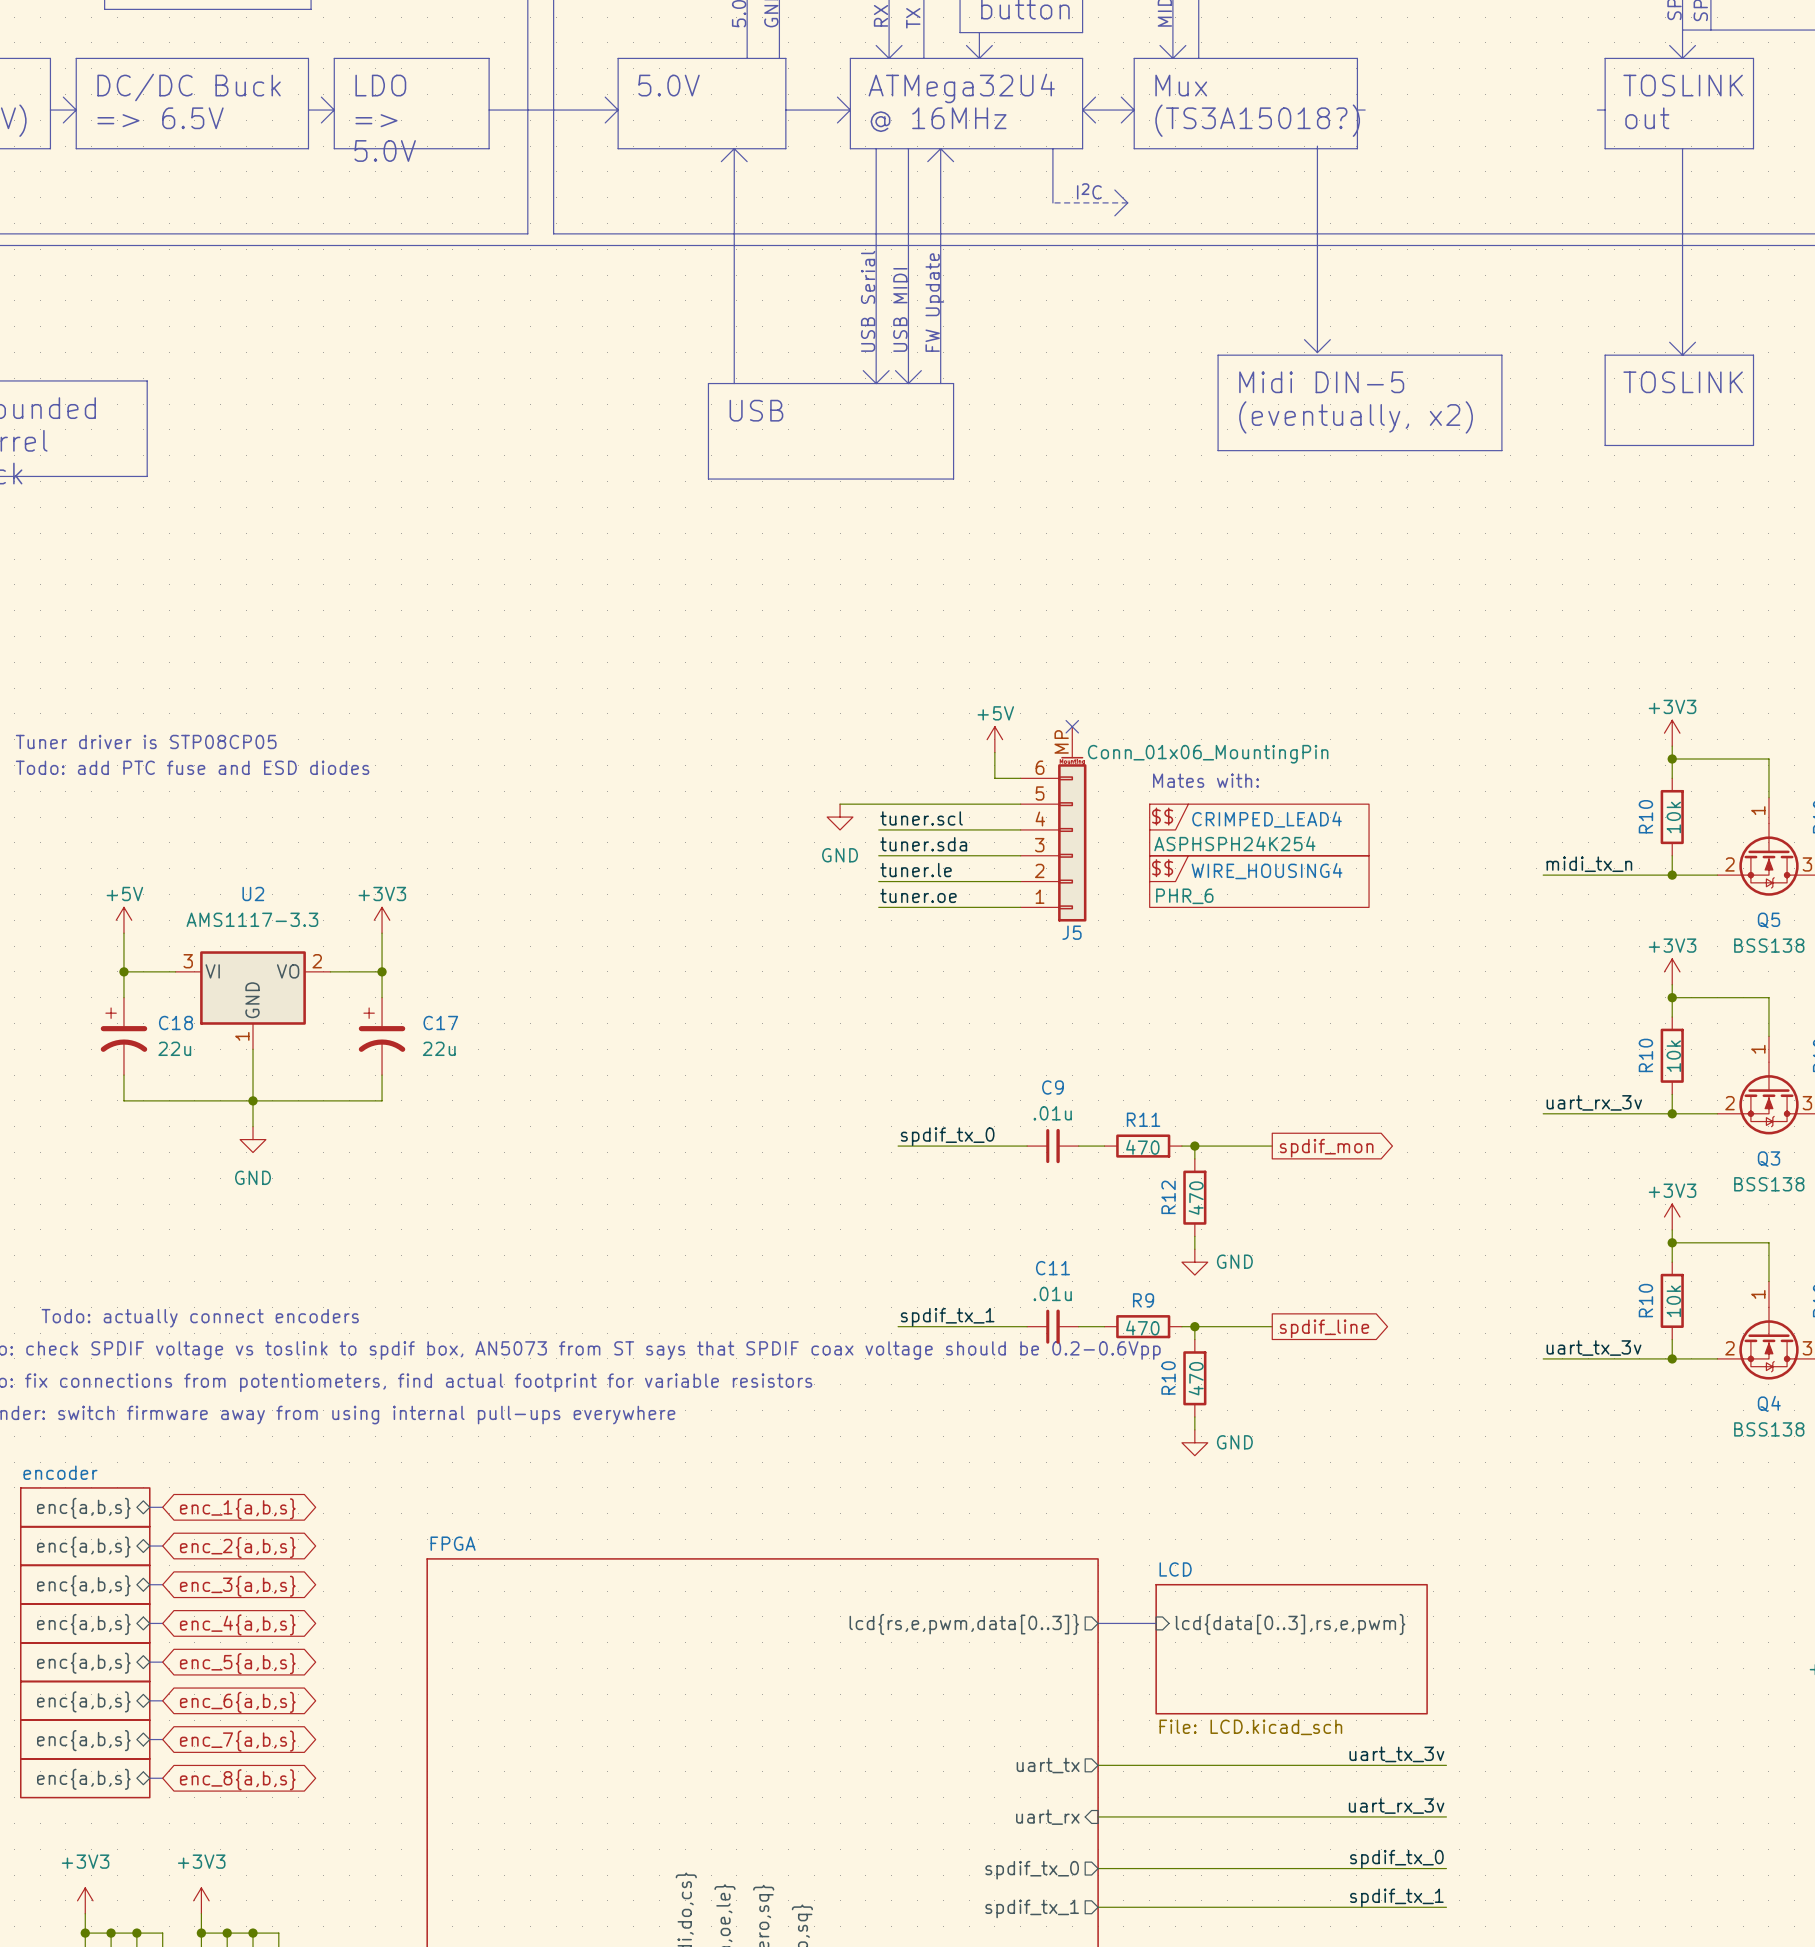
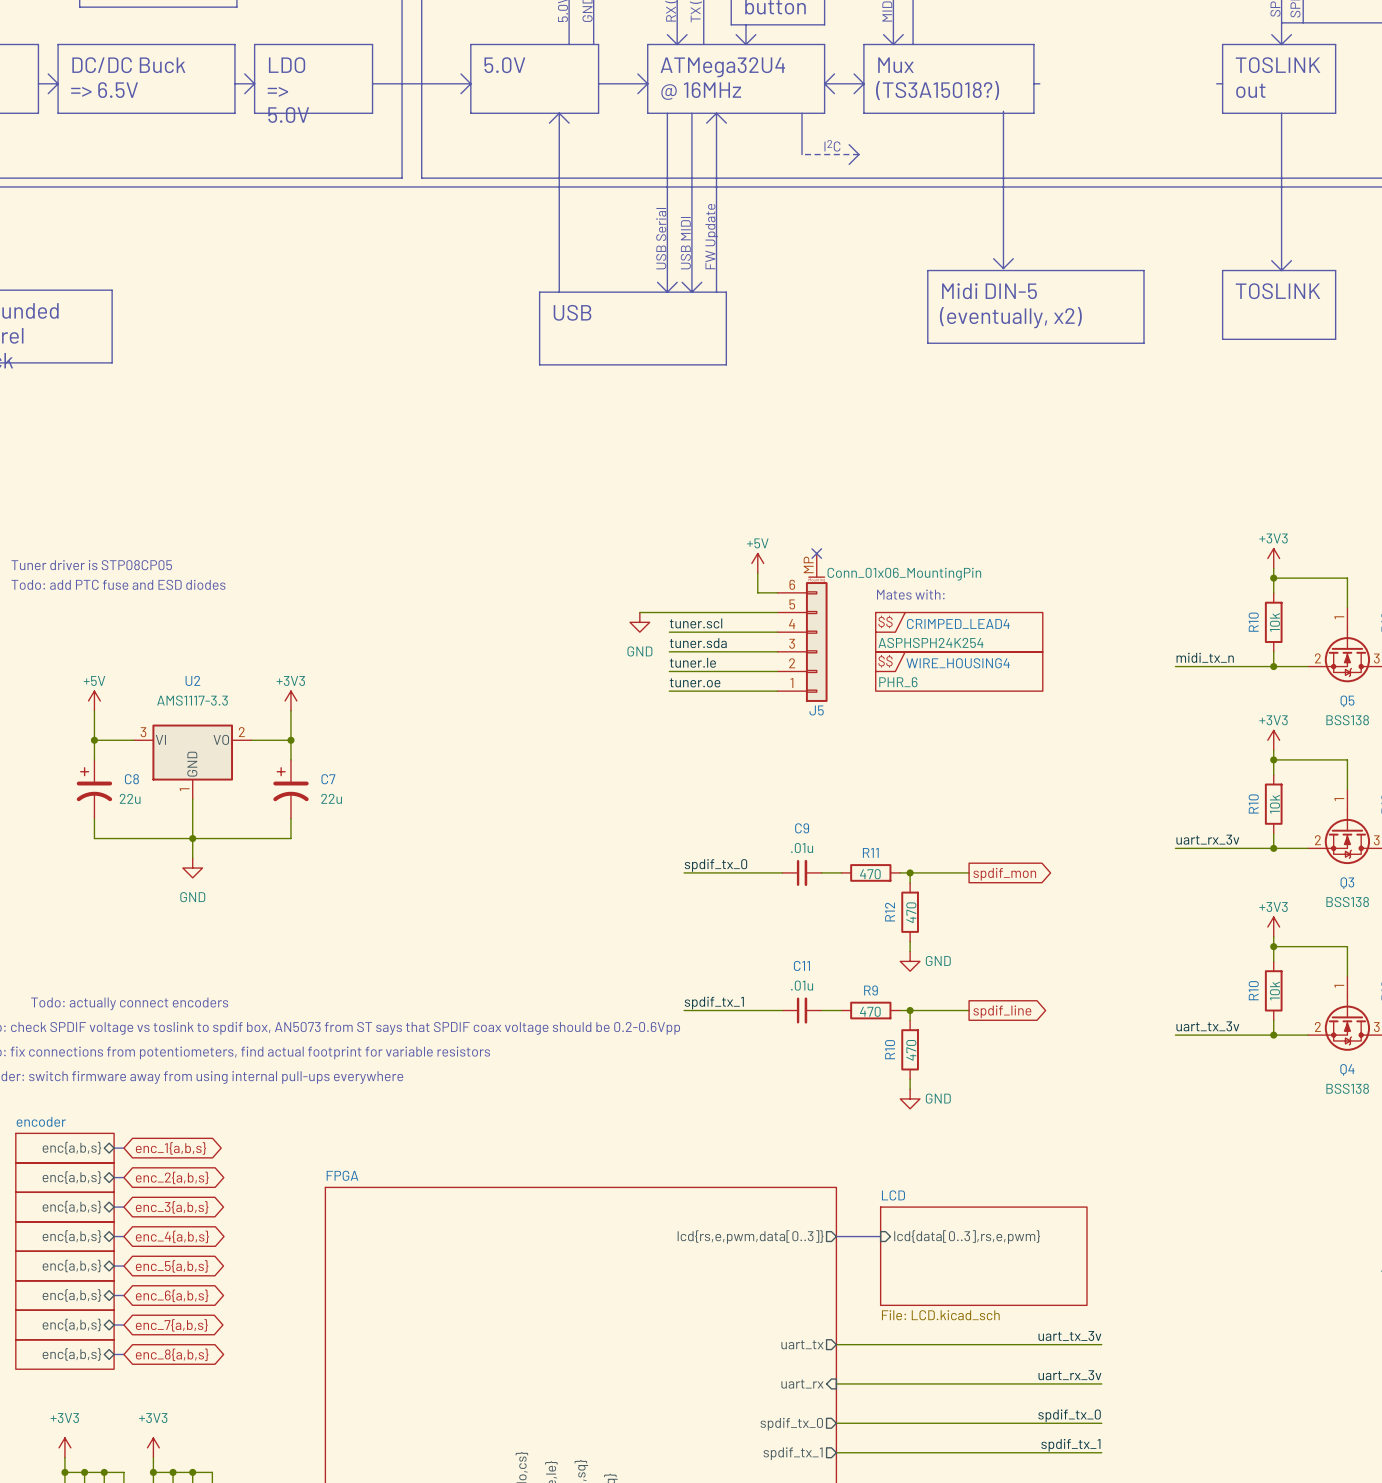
C18 name: C18 (175, 1023) -> C8 (131, 779)
C17 name: C17 (440, 1023) -> C7 (328, 779)

